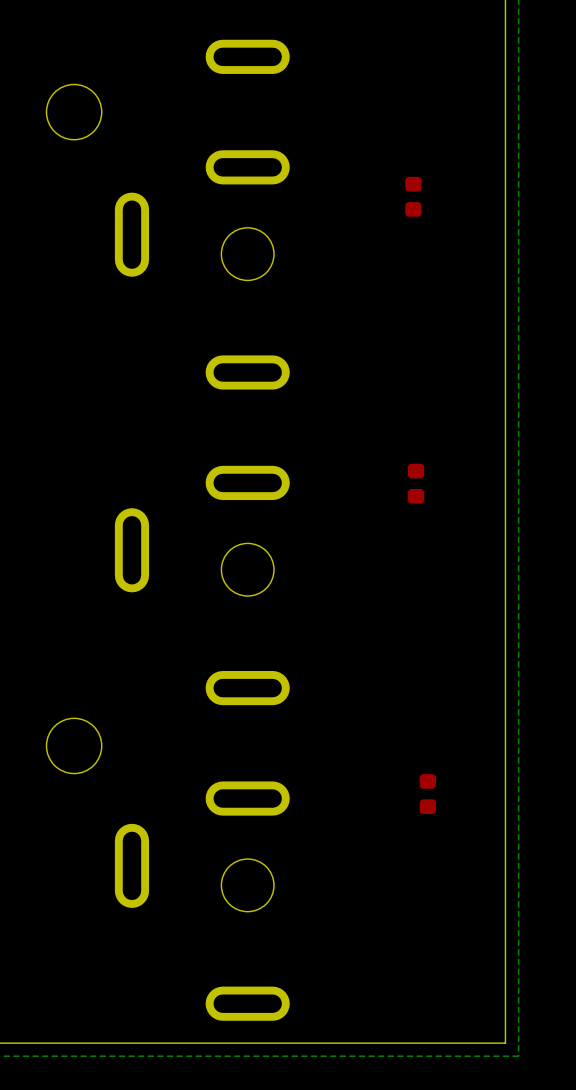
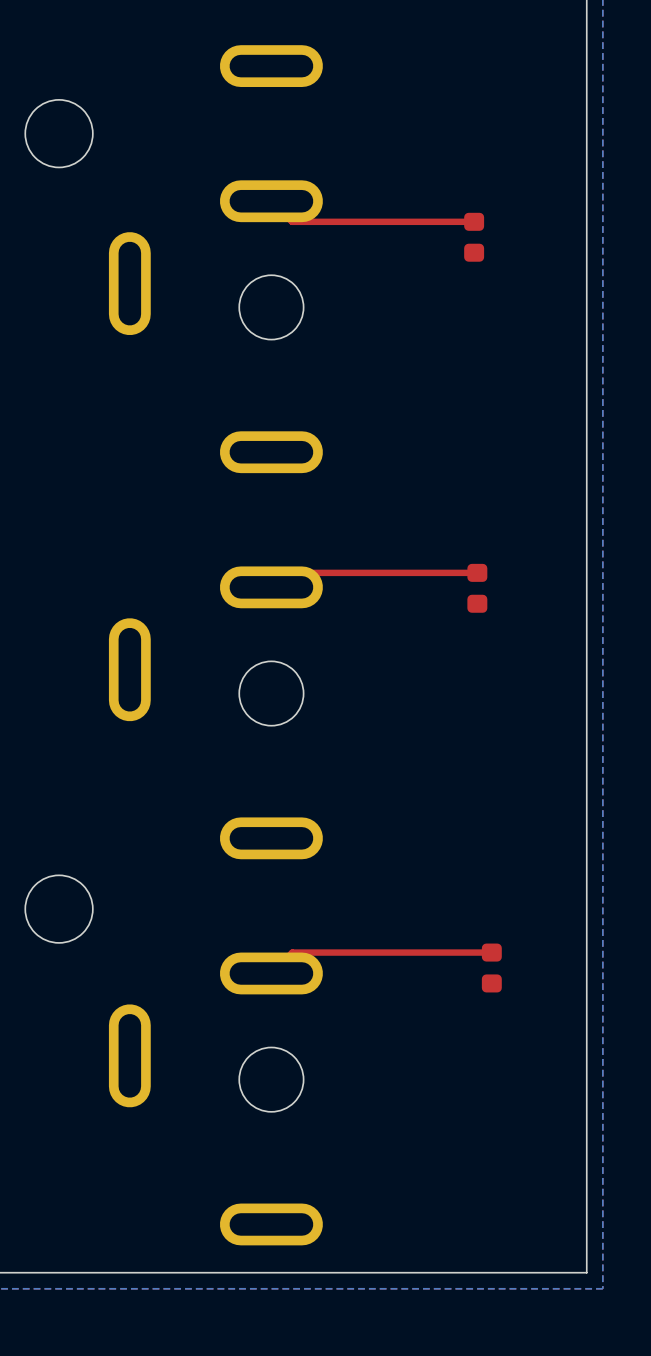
top track: none -> (271, 201) (292, 221) (474, 221)
top track: none -> (477, 572) (285, 572) (271, 587)
top track: none -> (491, 952) (292, 952) (271, 973)

